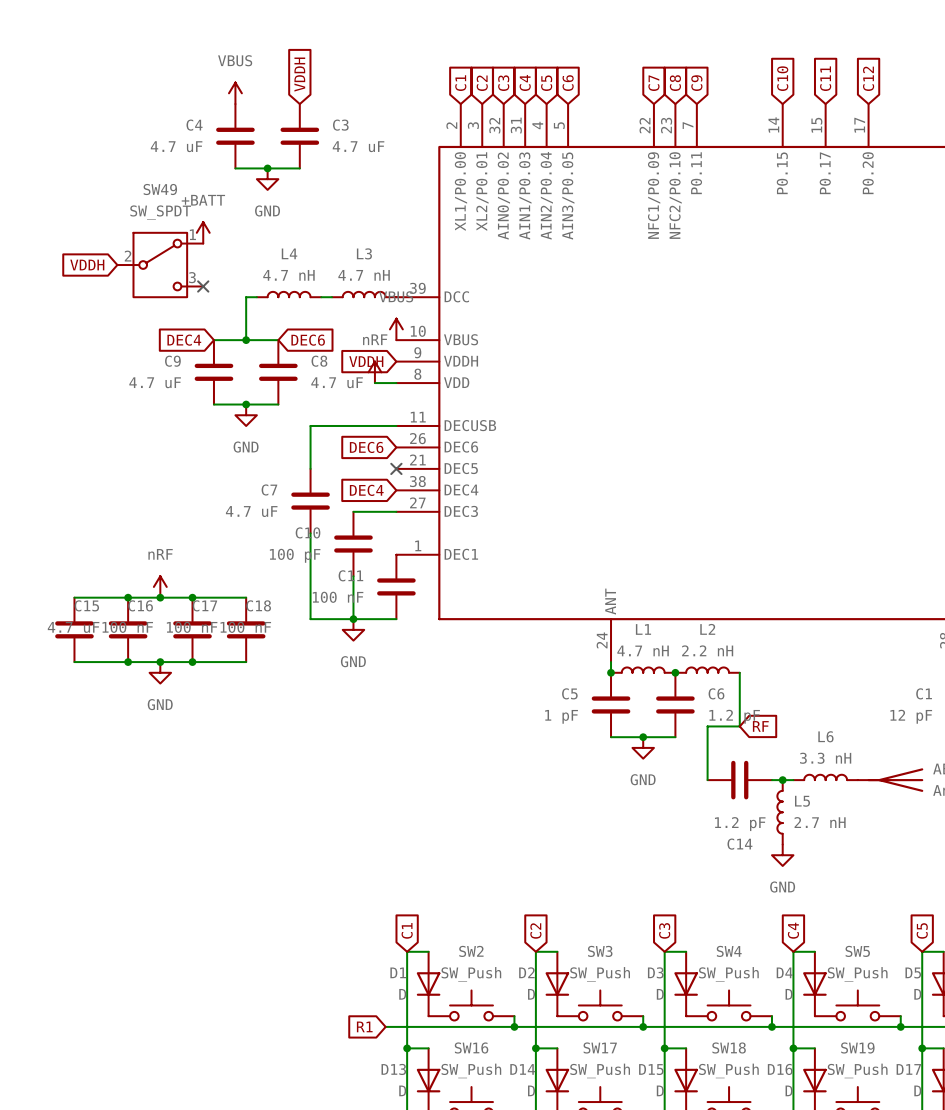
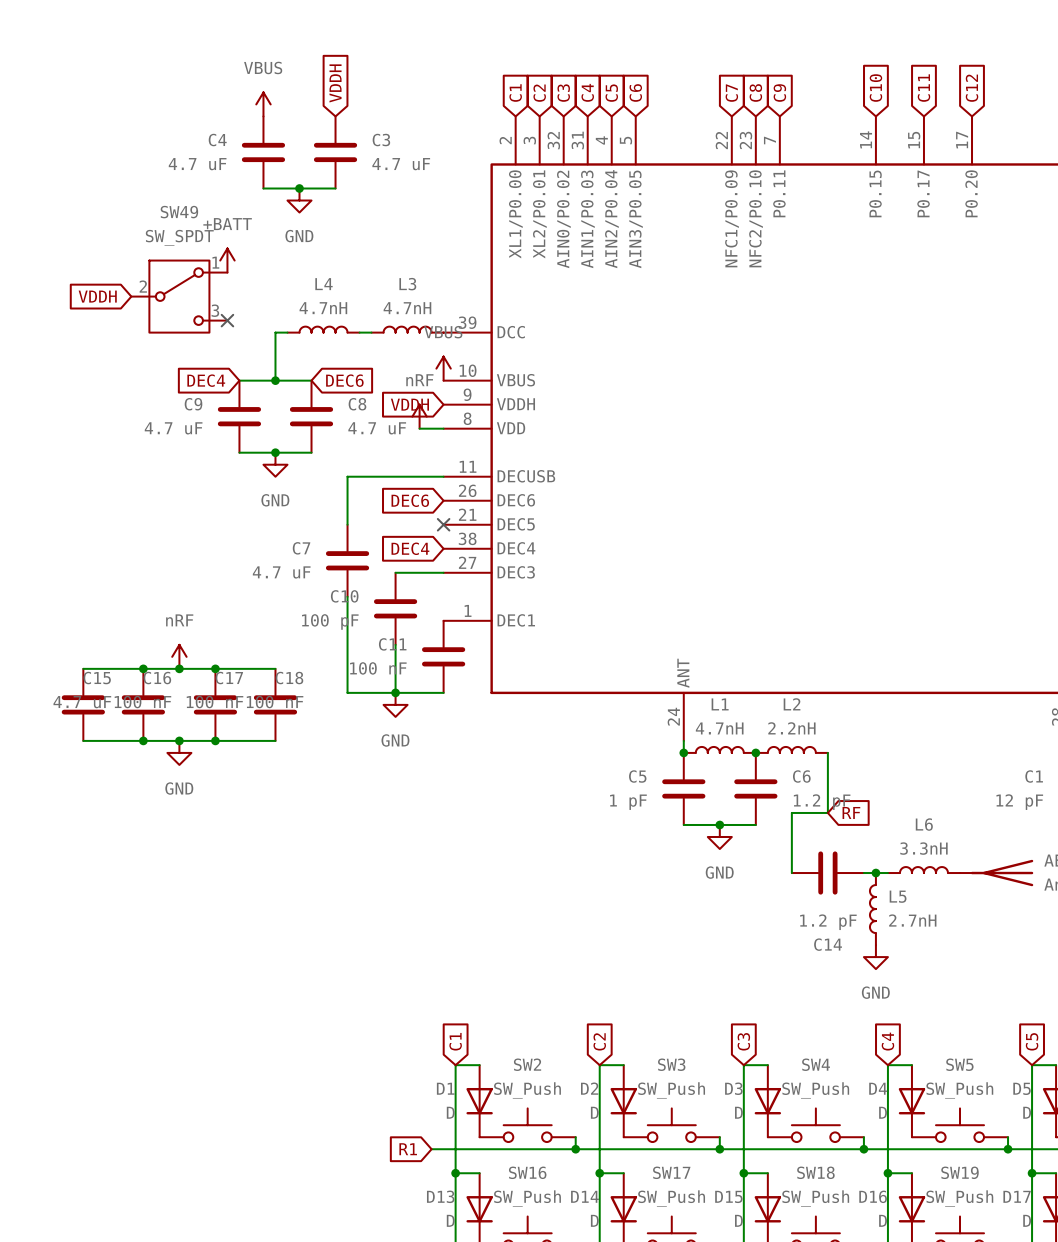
L4 value: 4.7 nH (288, 275) -> 4.7nH (323, 308)
L3 value: 4.7 nH (364, 275) -> 4.7nH (407, 308)
L1 value: 4.7 nH (643, 650) -> 4.7nH (719, 728)
L2 value: 2.2 nH (707, 650) -> 2.2nH (791, 728)
L6 value: 3.3 nH (825, 758) -> 3.3nH (923, 848)
L5 value: 2.7 nH (820, 822) -> 2.7nH (912, 920)

